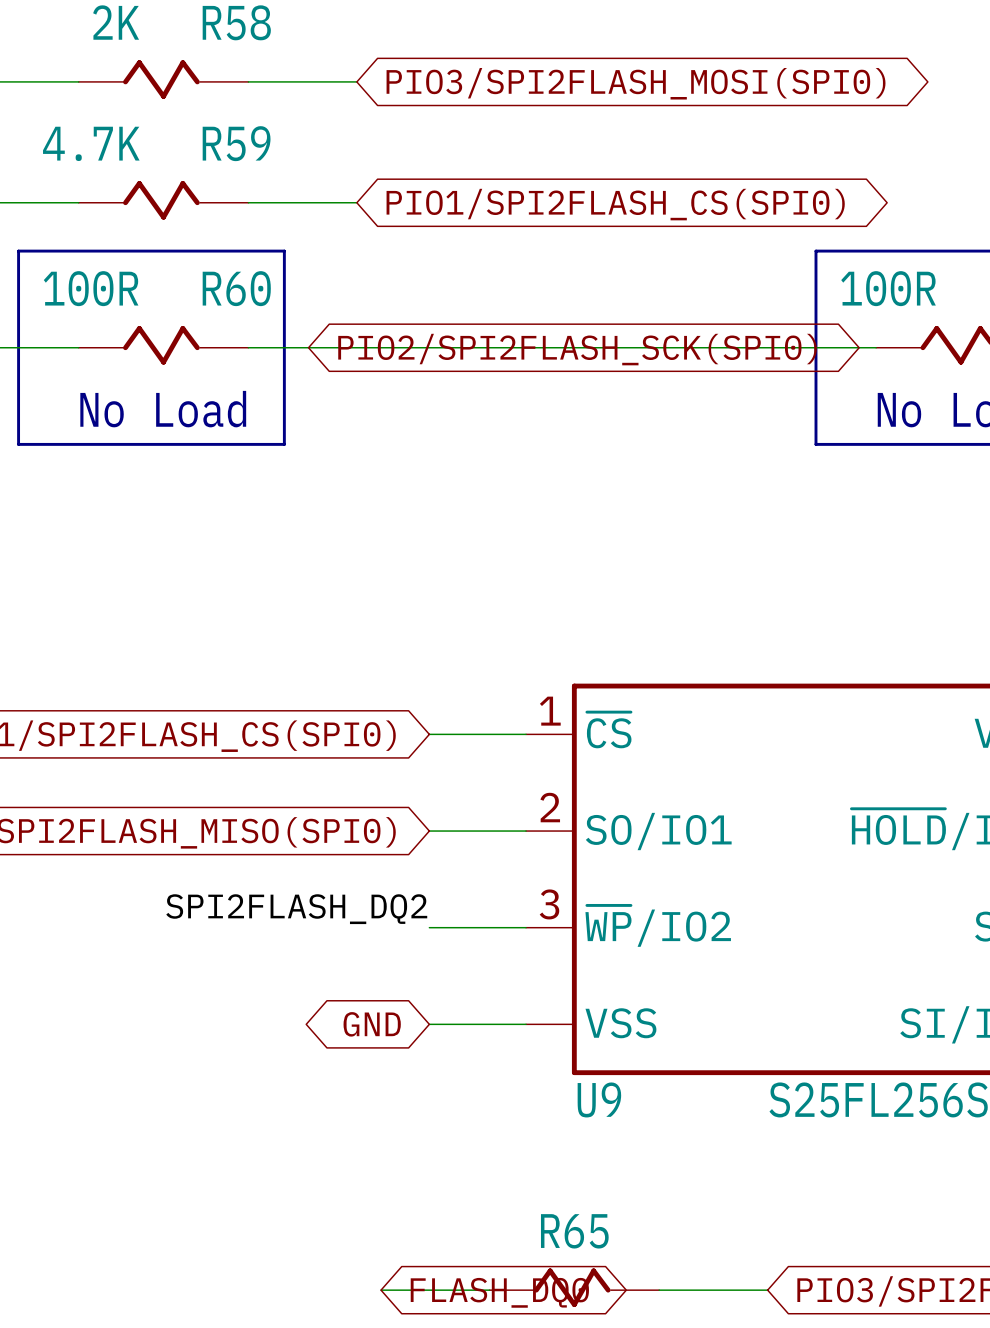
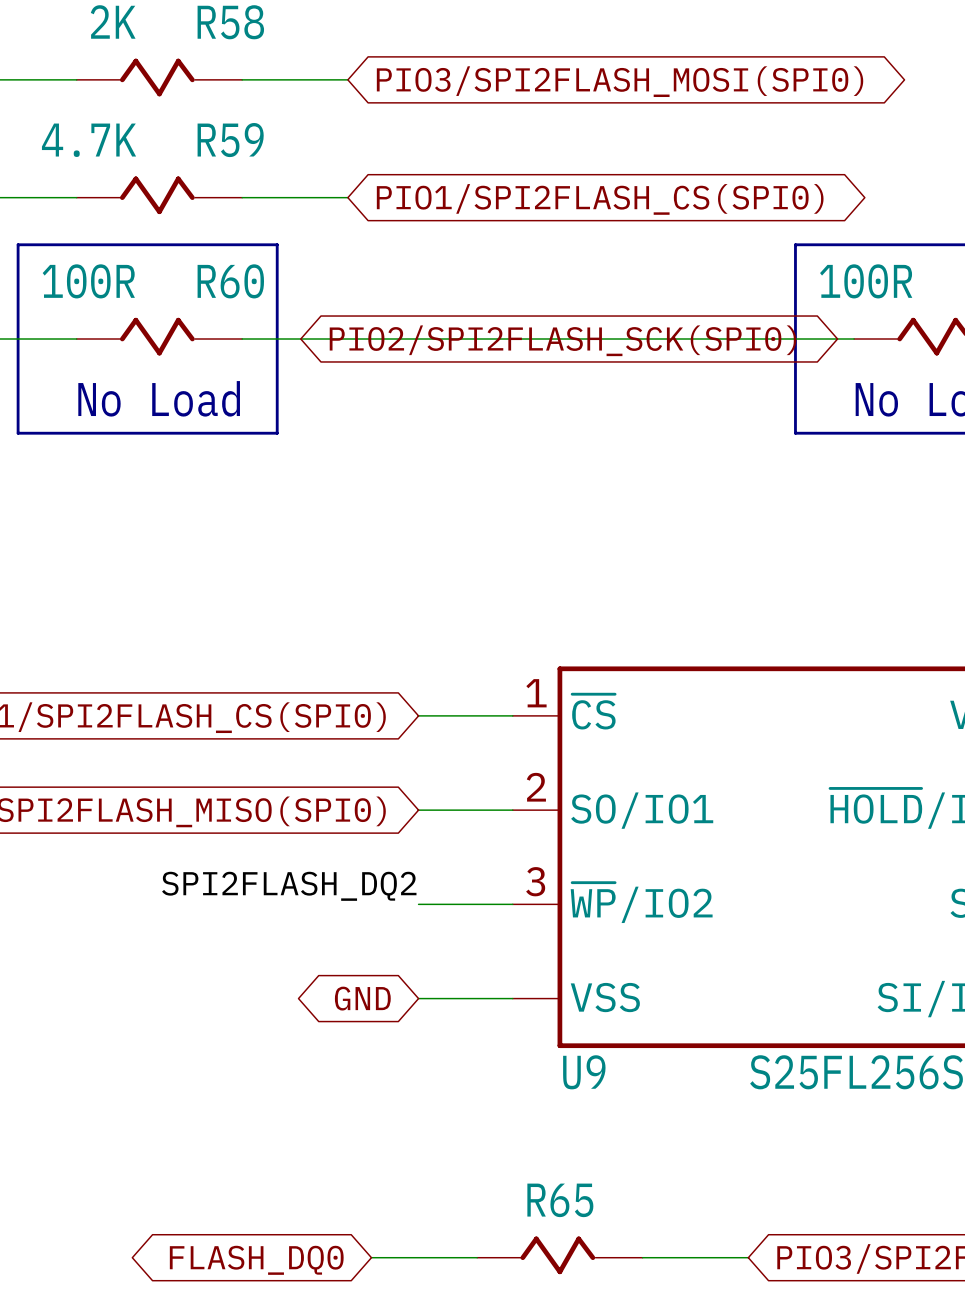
global label rotation: 0° (499, 1292) -> 180° (256, 1260)

